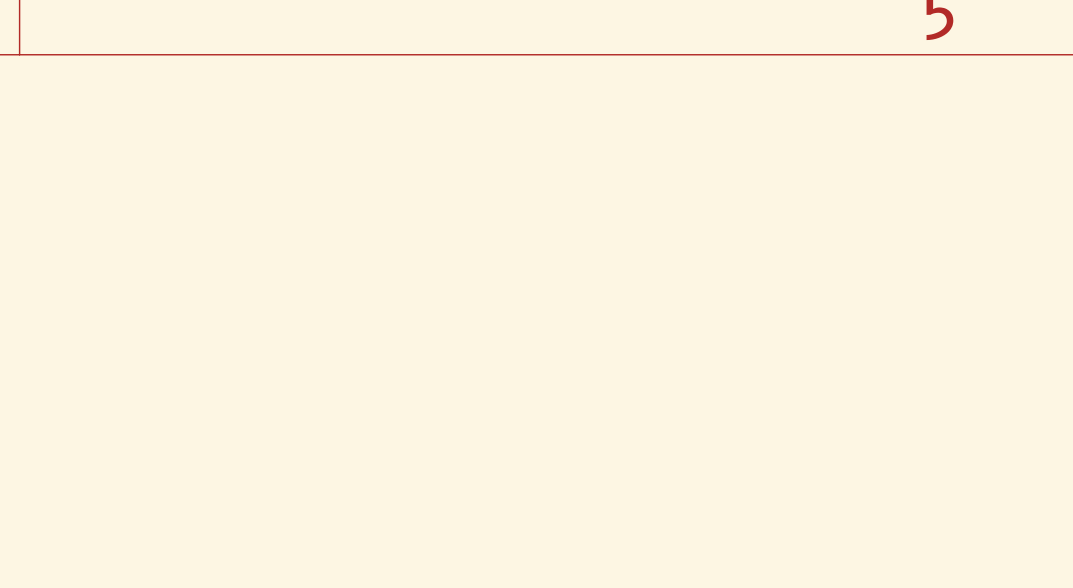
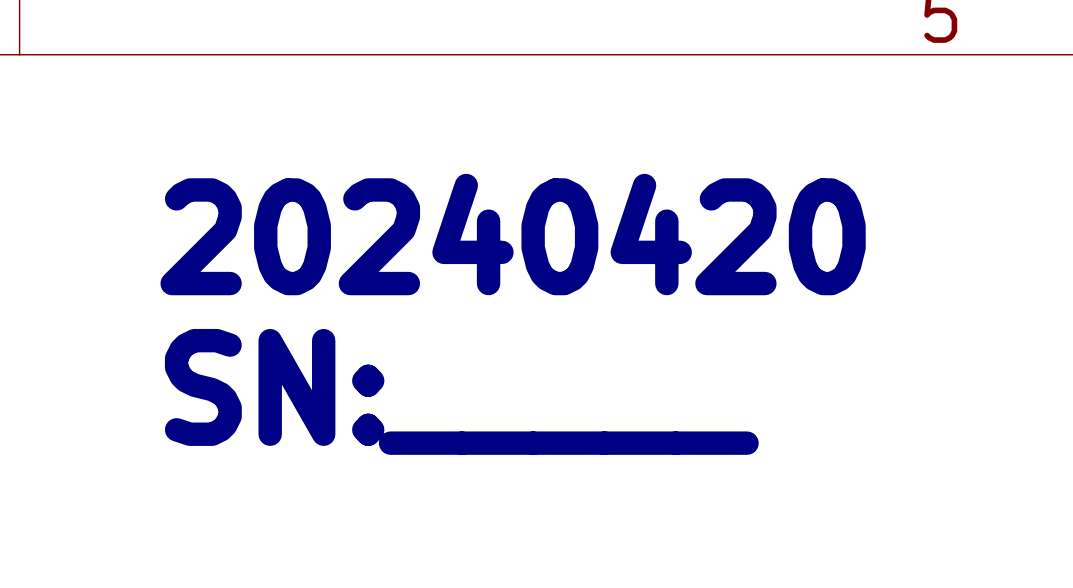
text: none -> 20240420 (513, 234)
text: none -> SN:_____ (461, 391)

